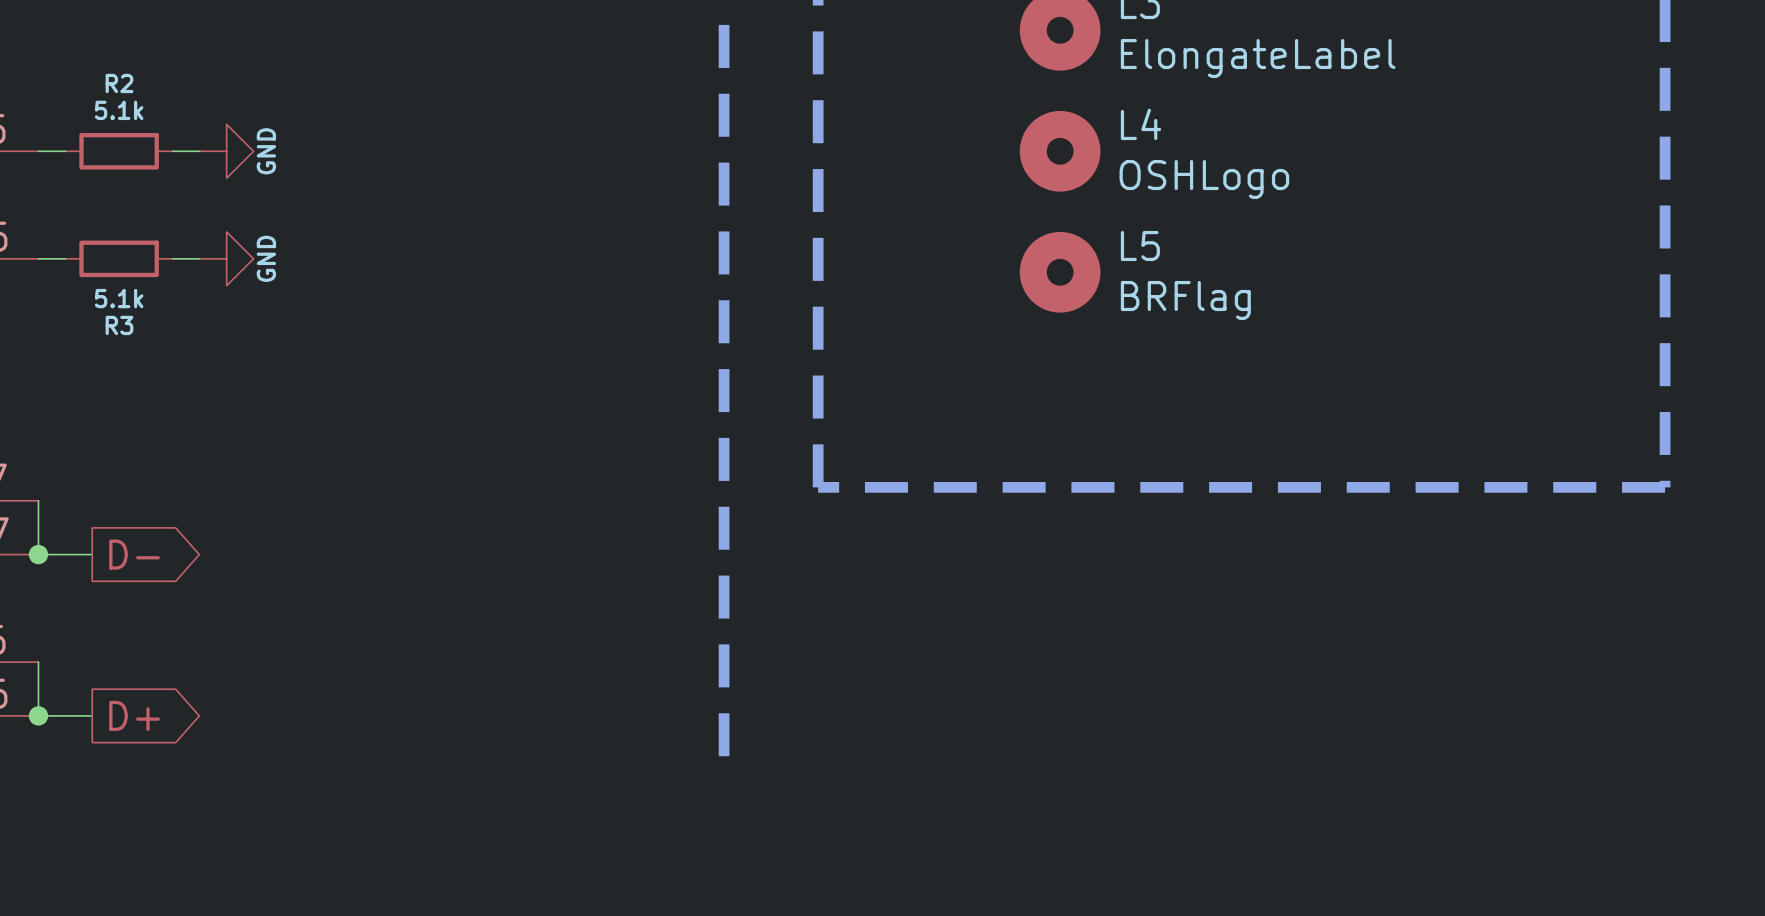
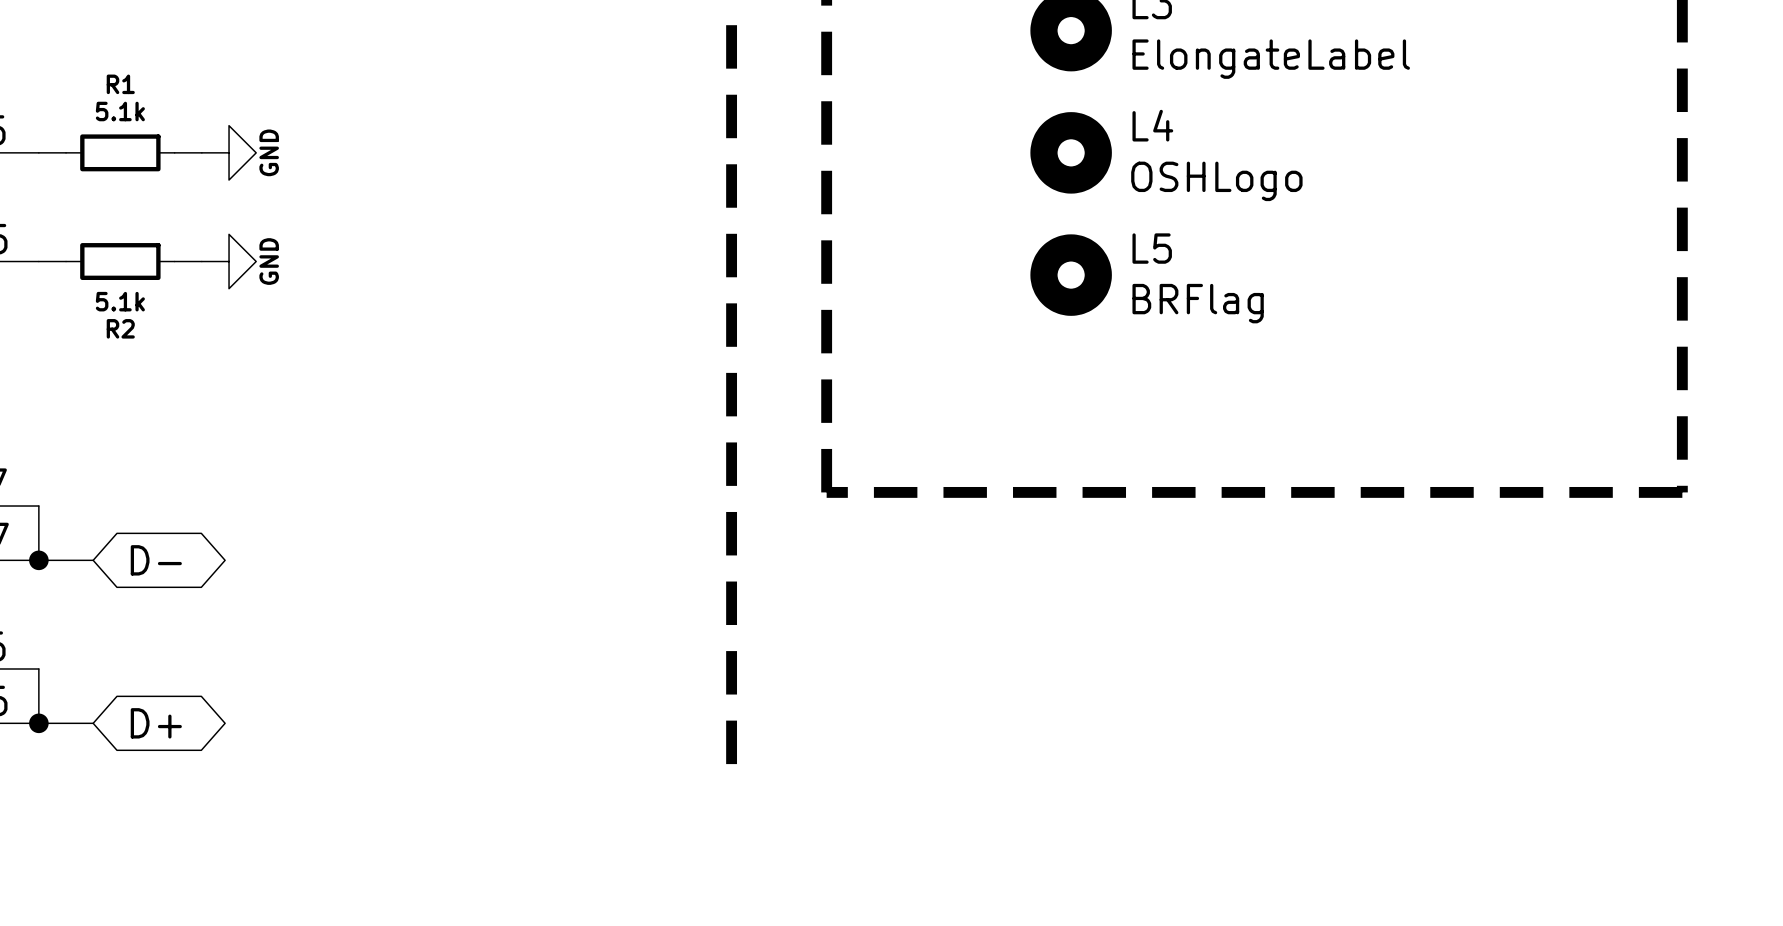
R2 name: R2 (119, 83) -> R1 (120, 84)
R3 name: R3 (119, 325) -> R2 (120, 328)
global label shape: output (134, 554) -> bidirectional (156, 560)
global label shape: output (134, 715) -> bidirectional (156, 723)

